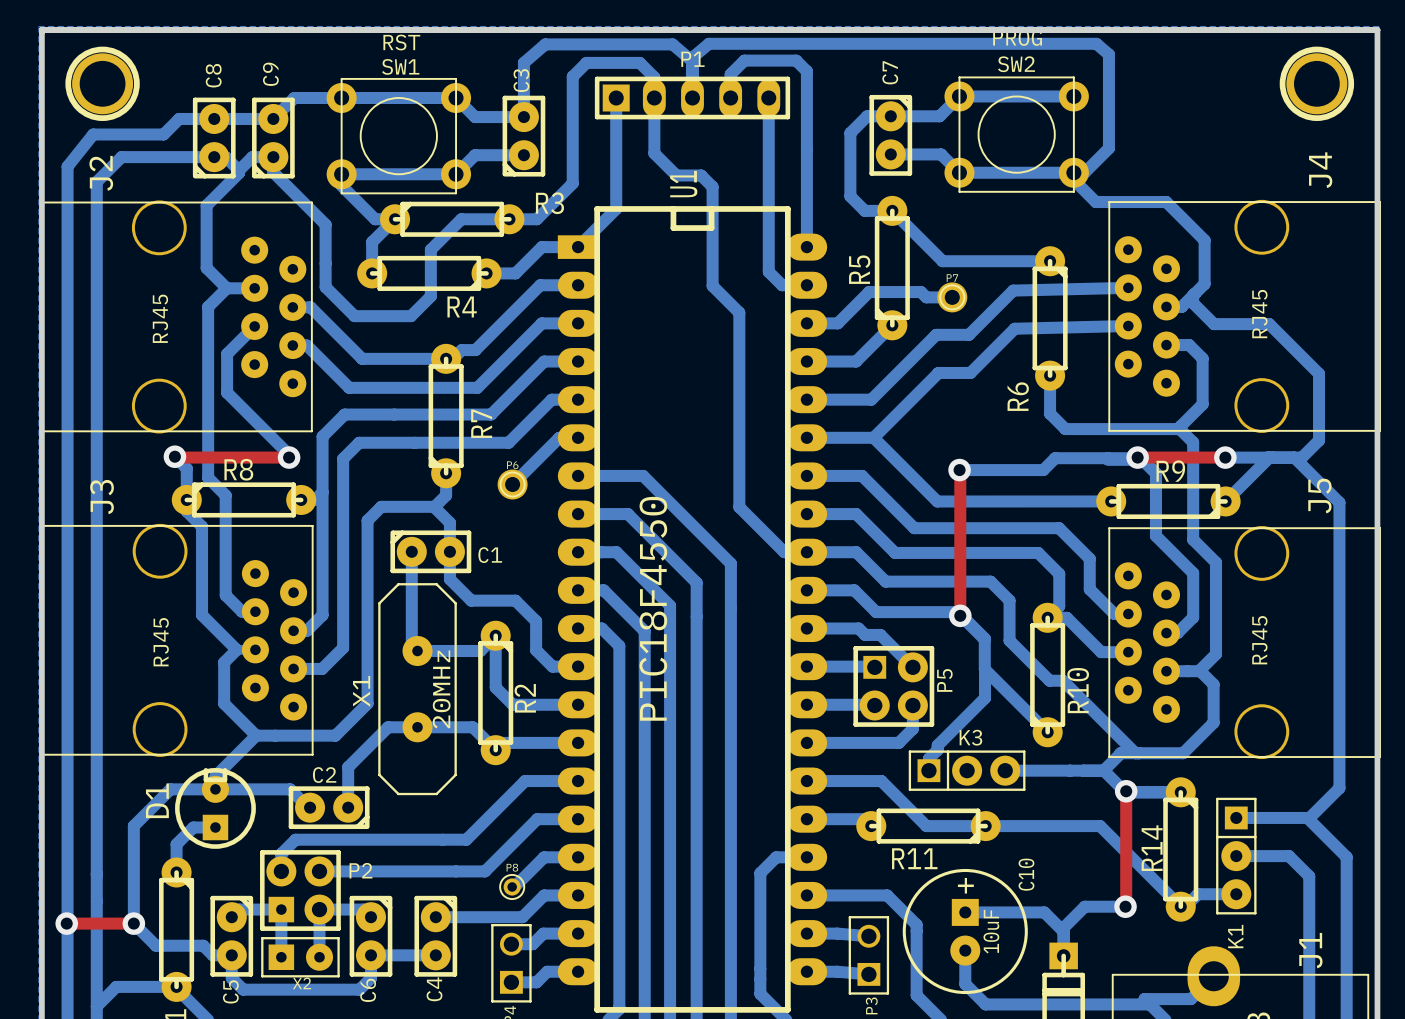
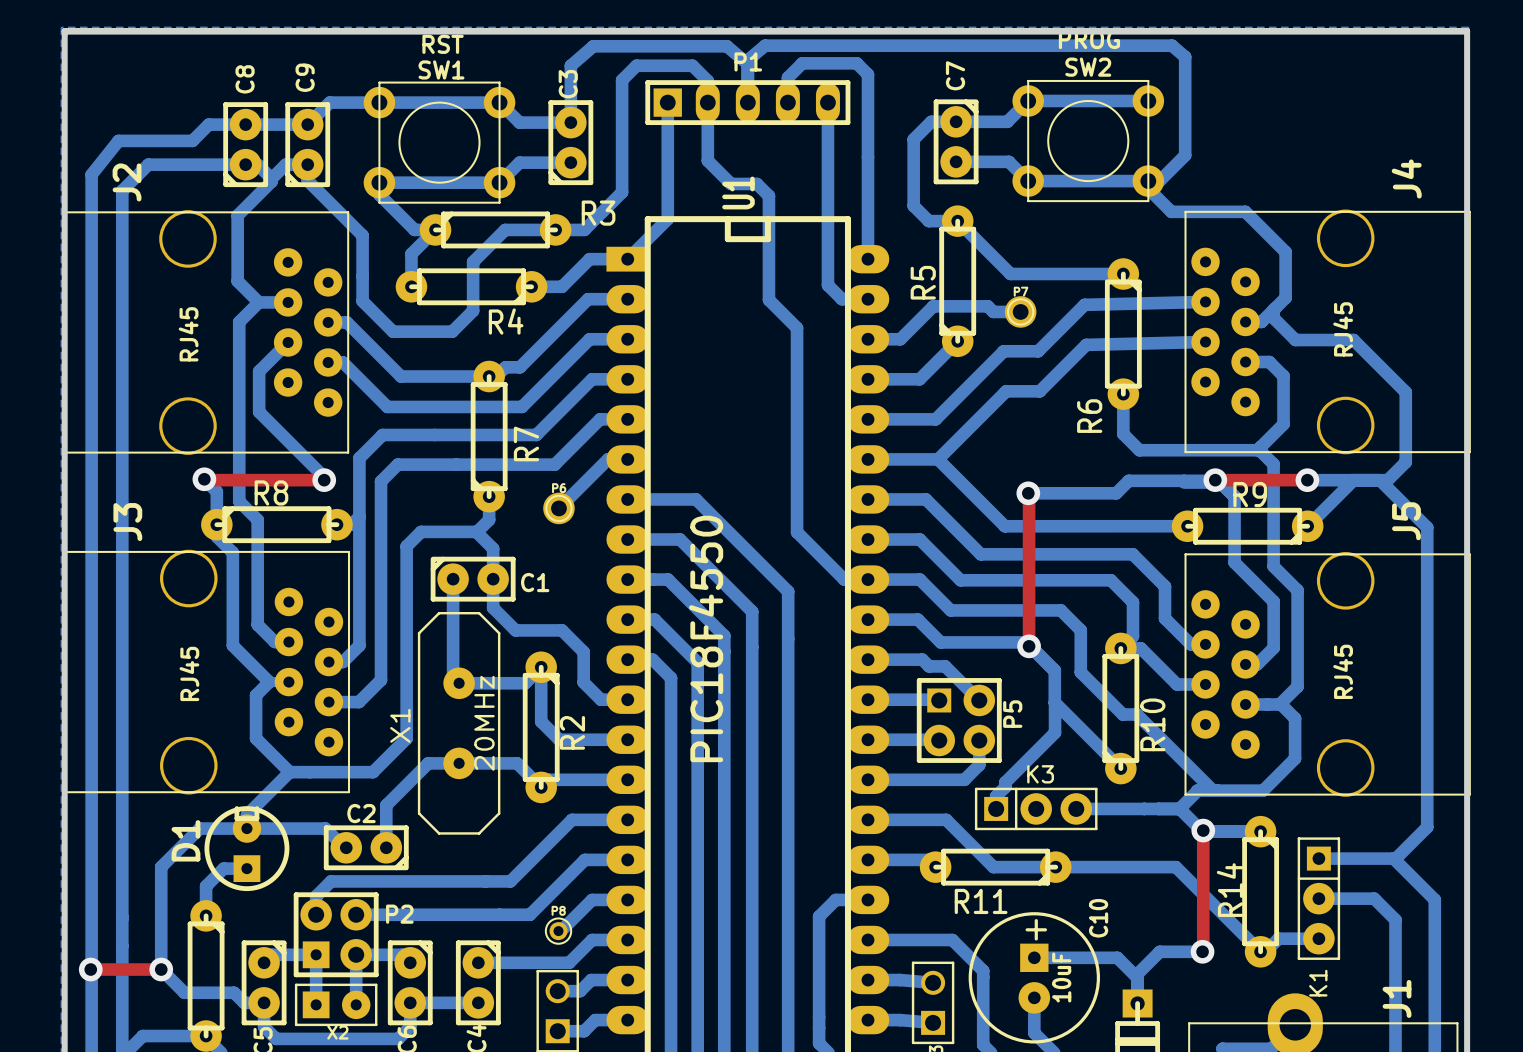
part: (102, 83) -> none
part: (1316, 83) -> none

